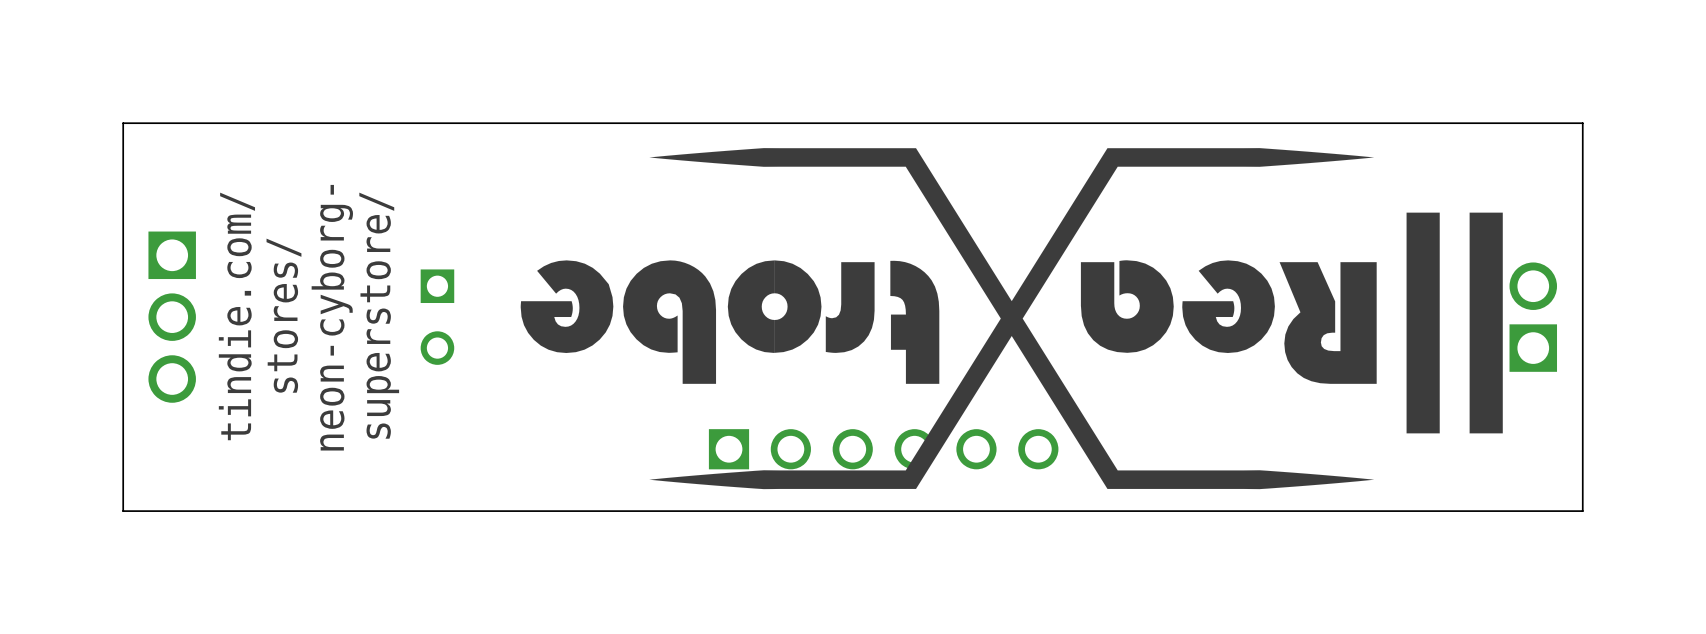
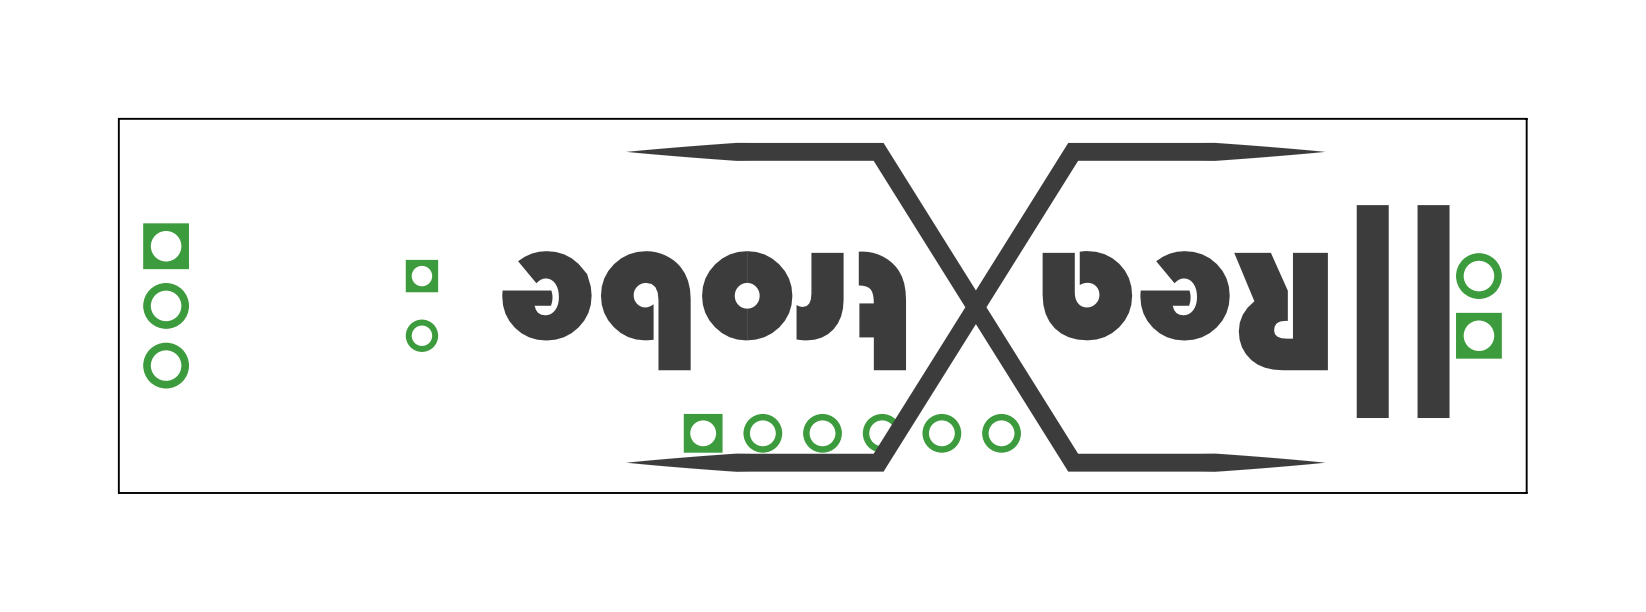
text: stores/ (283, 315) -> none
text: superstore/ (379, 315) -> none
text: tindie.com/ (236, 316) -> none
text: neon-cyborg- (332, 317) -> none

